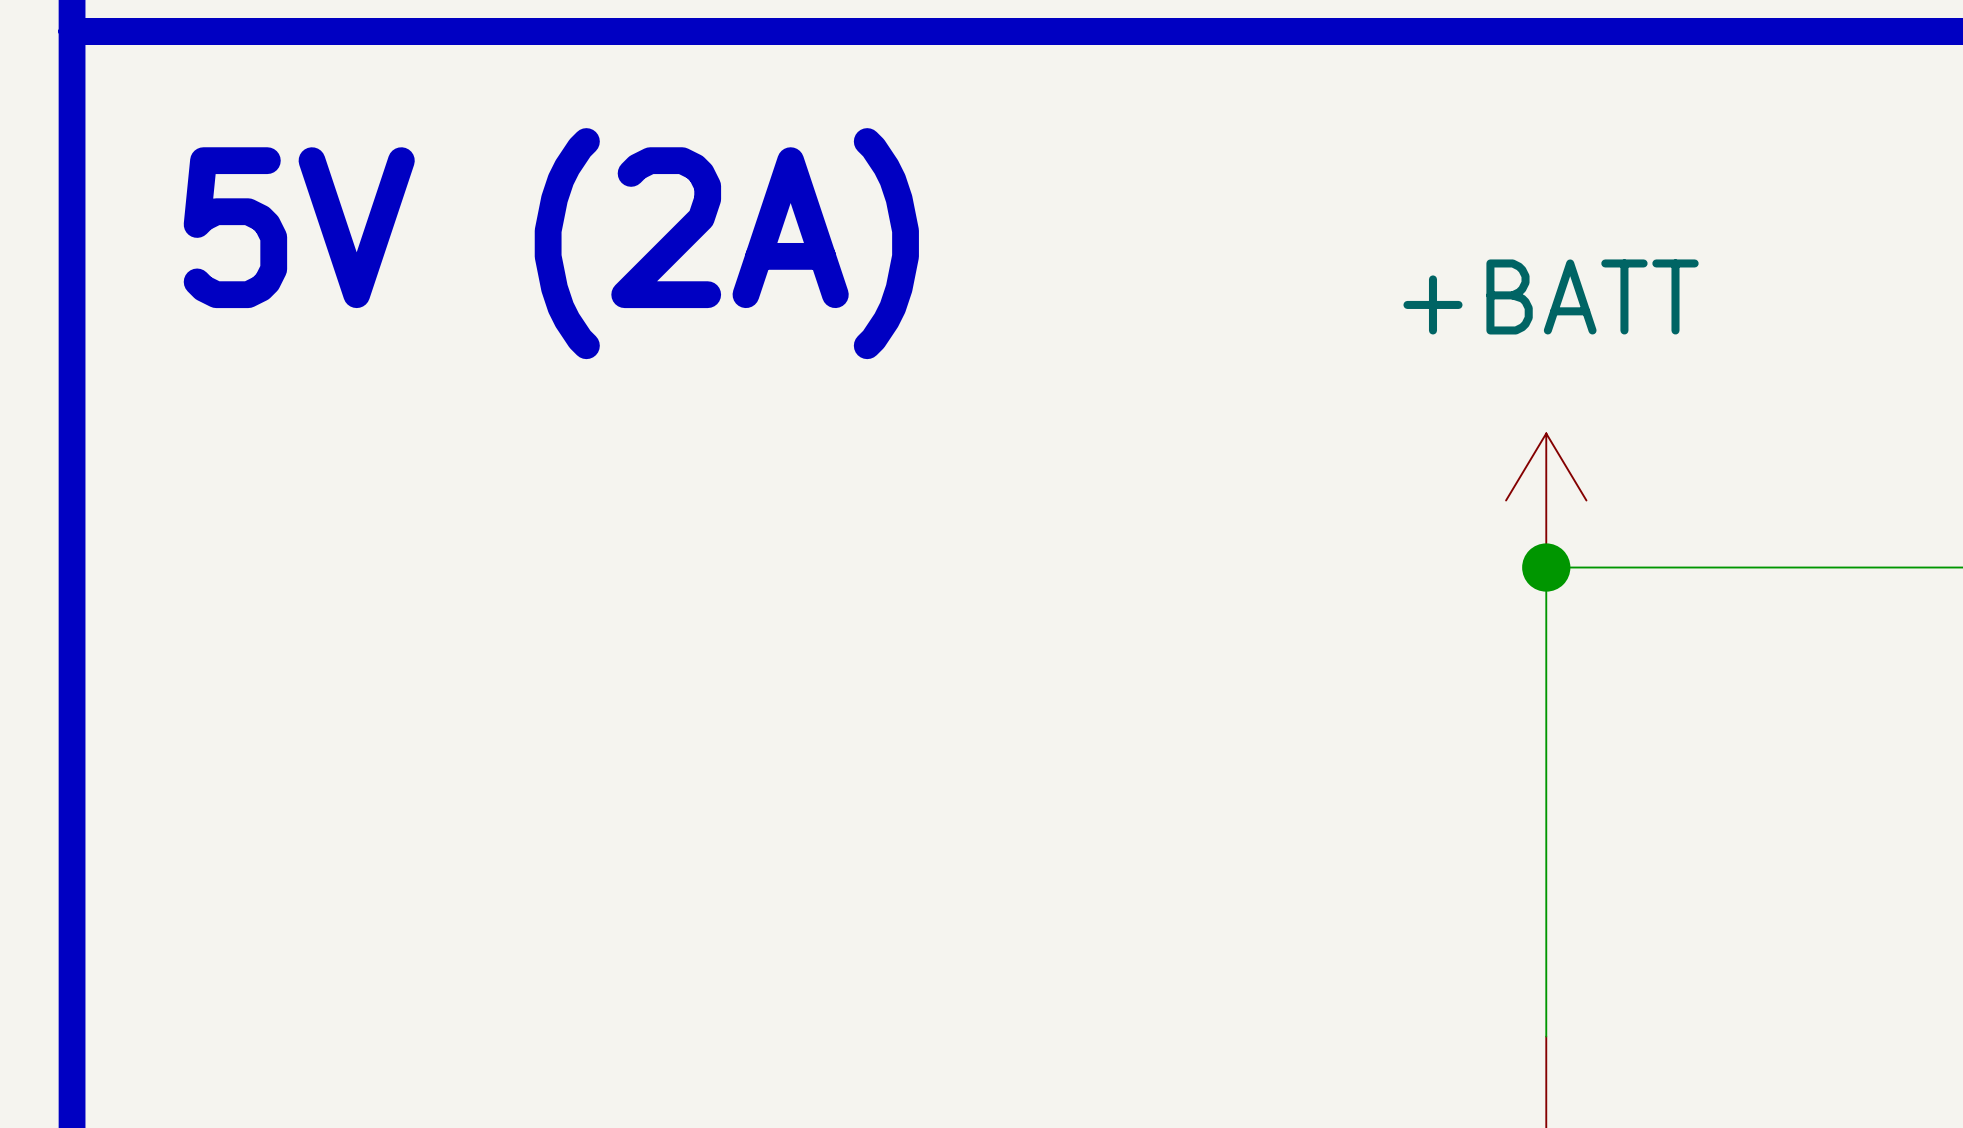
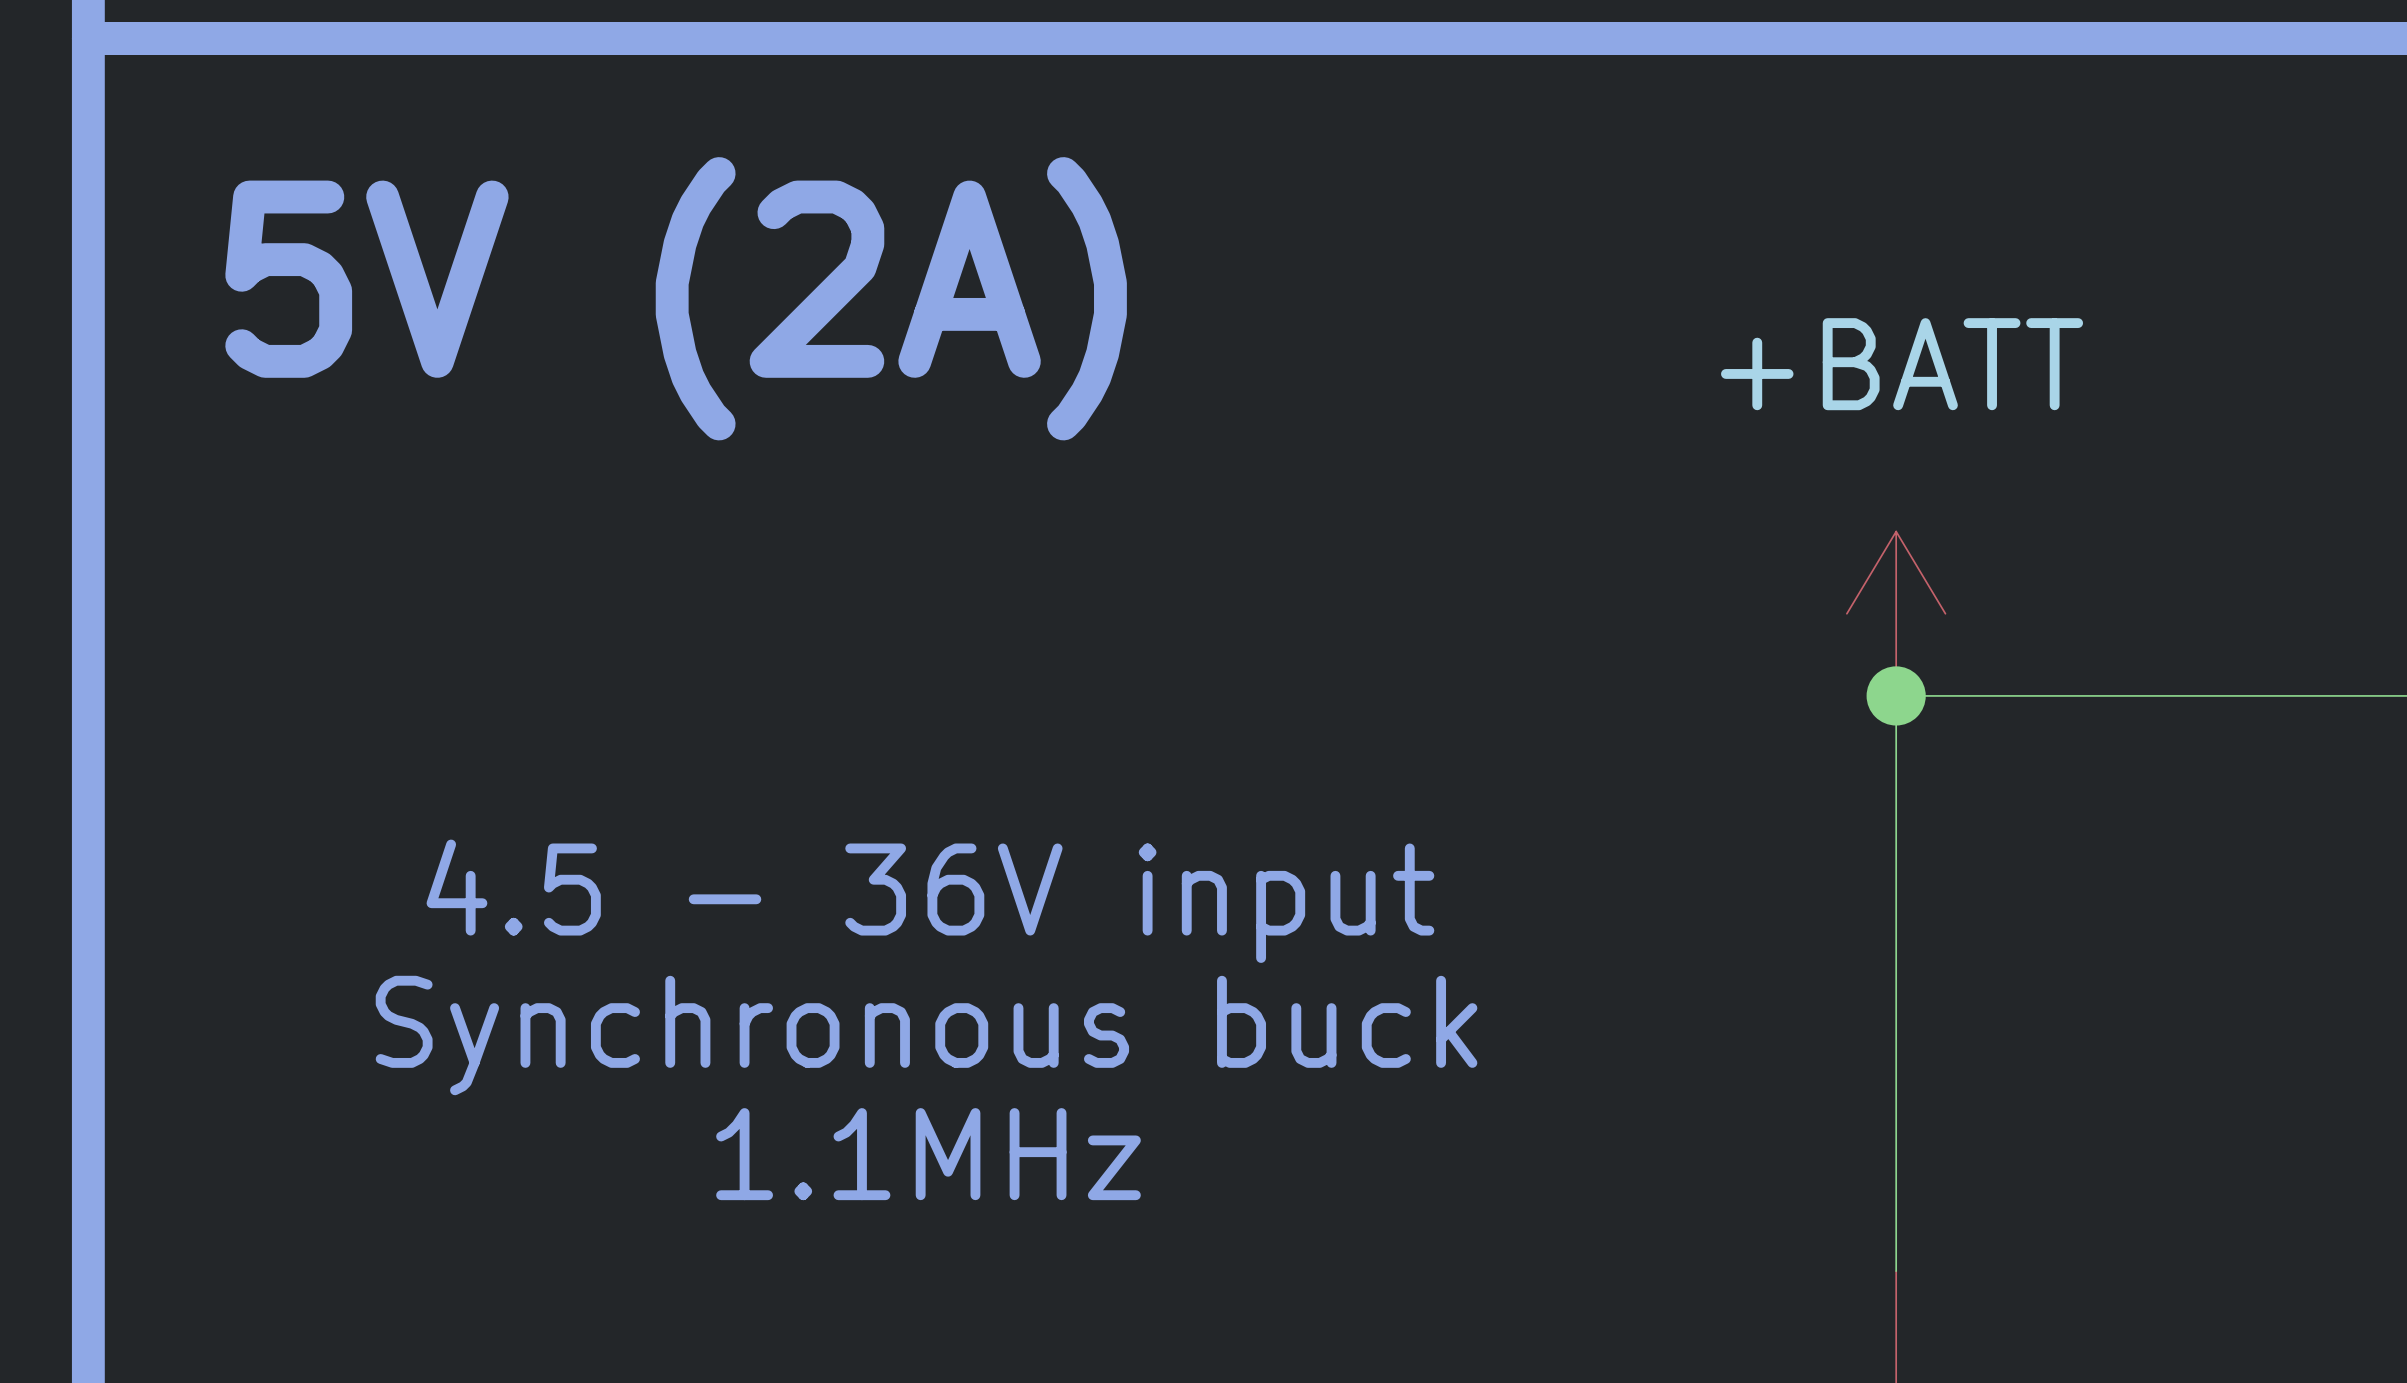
text: none -> 4.5 - 36V input (930, 901)
text: none -> Synchronous buck (926, 1035)
text: none -> 1.1MHz (928, 1154)

